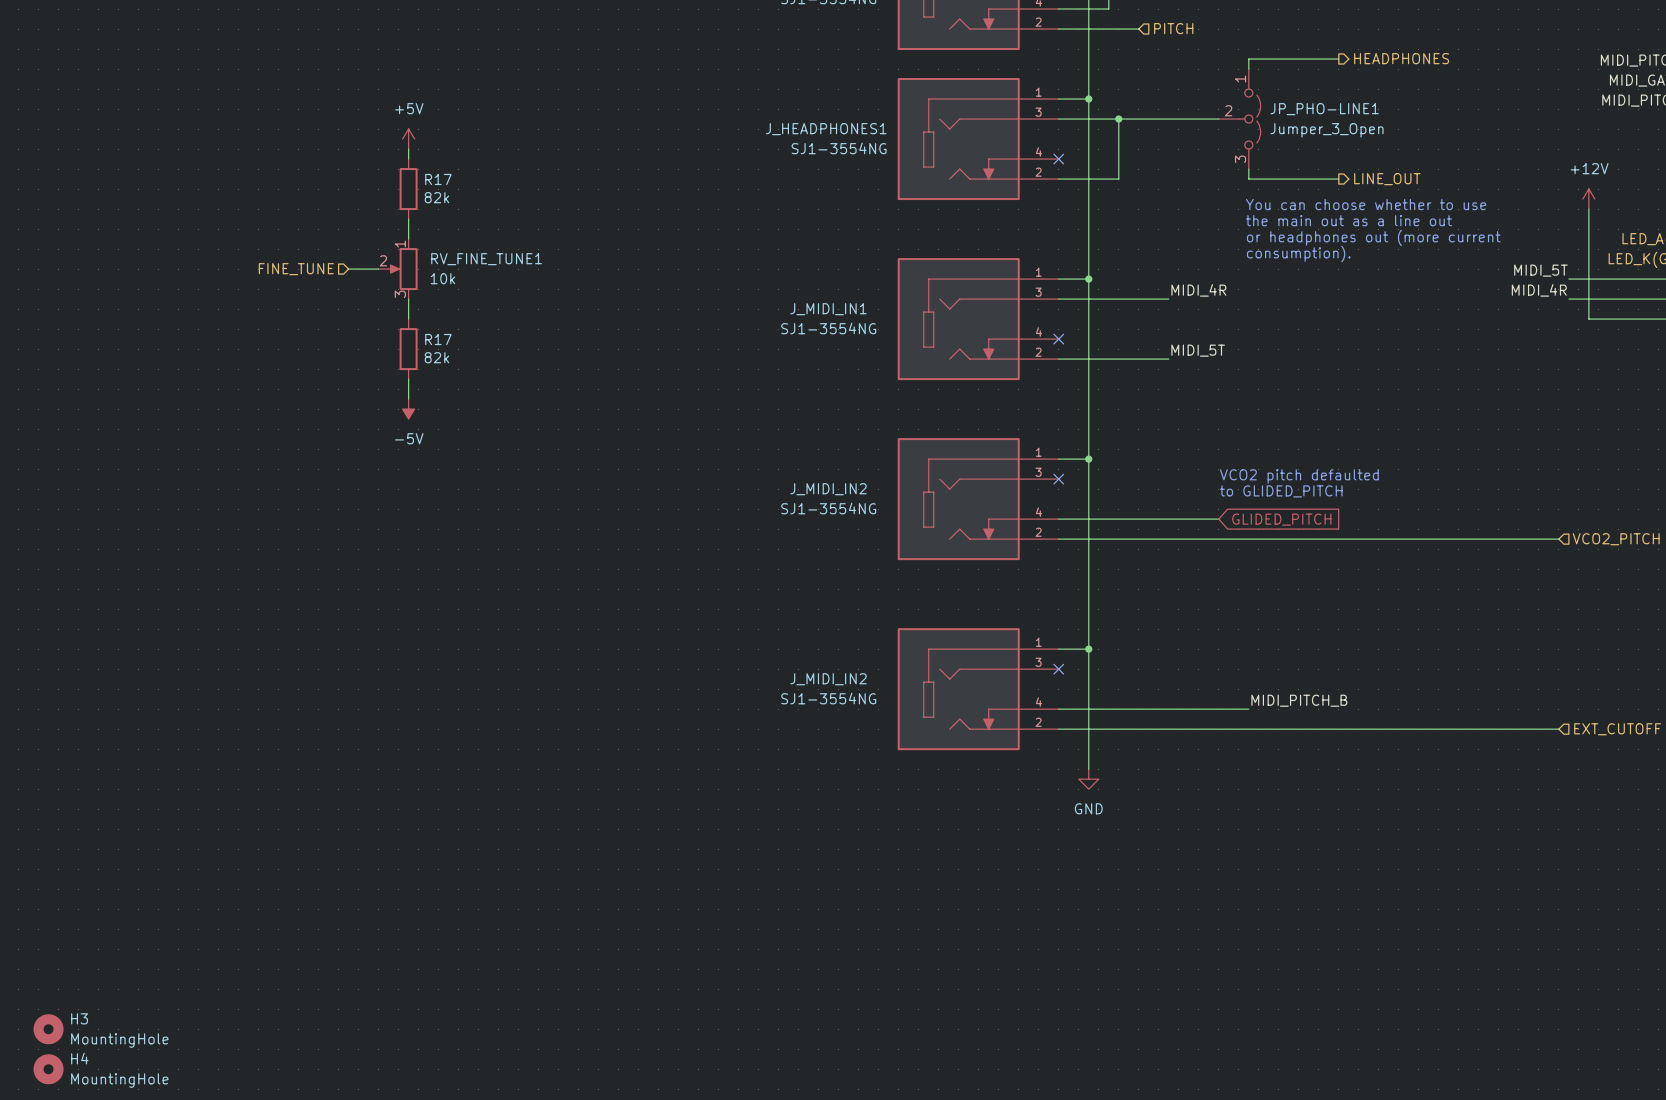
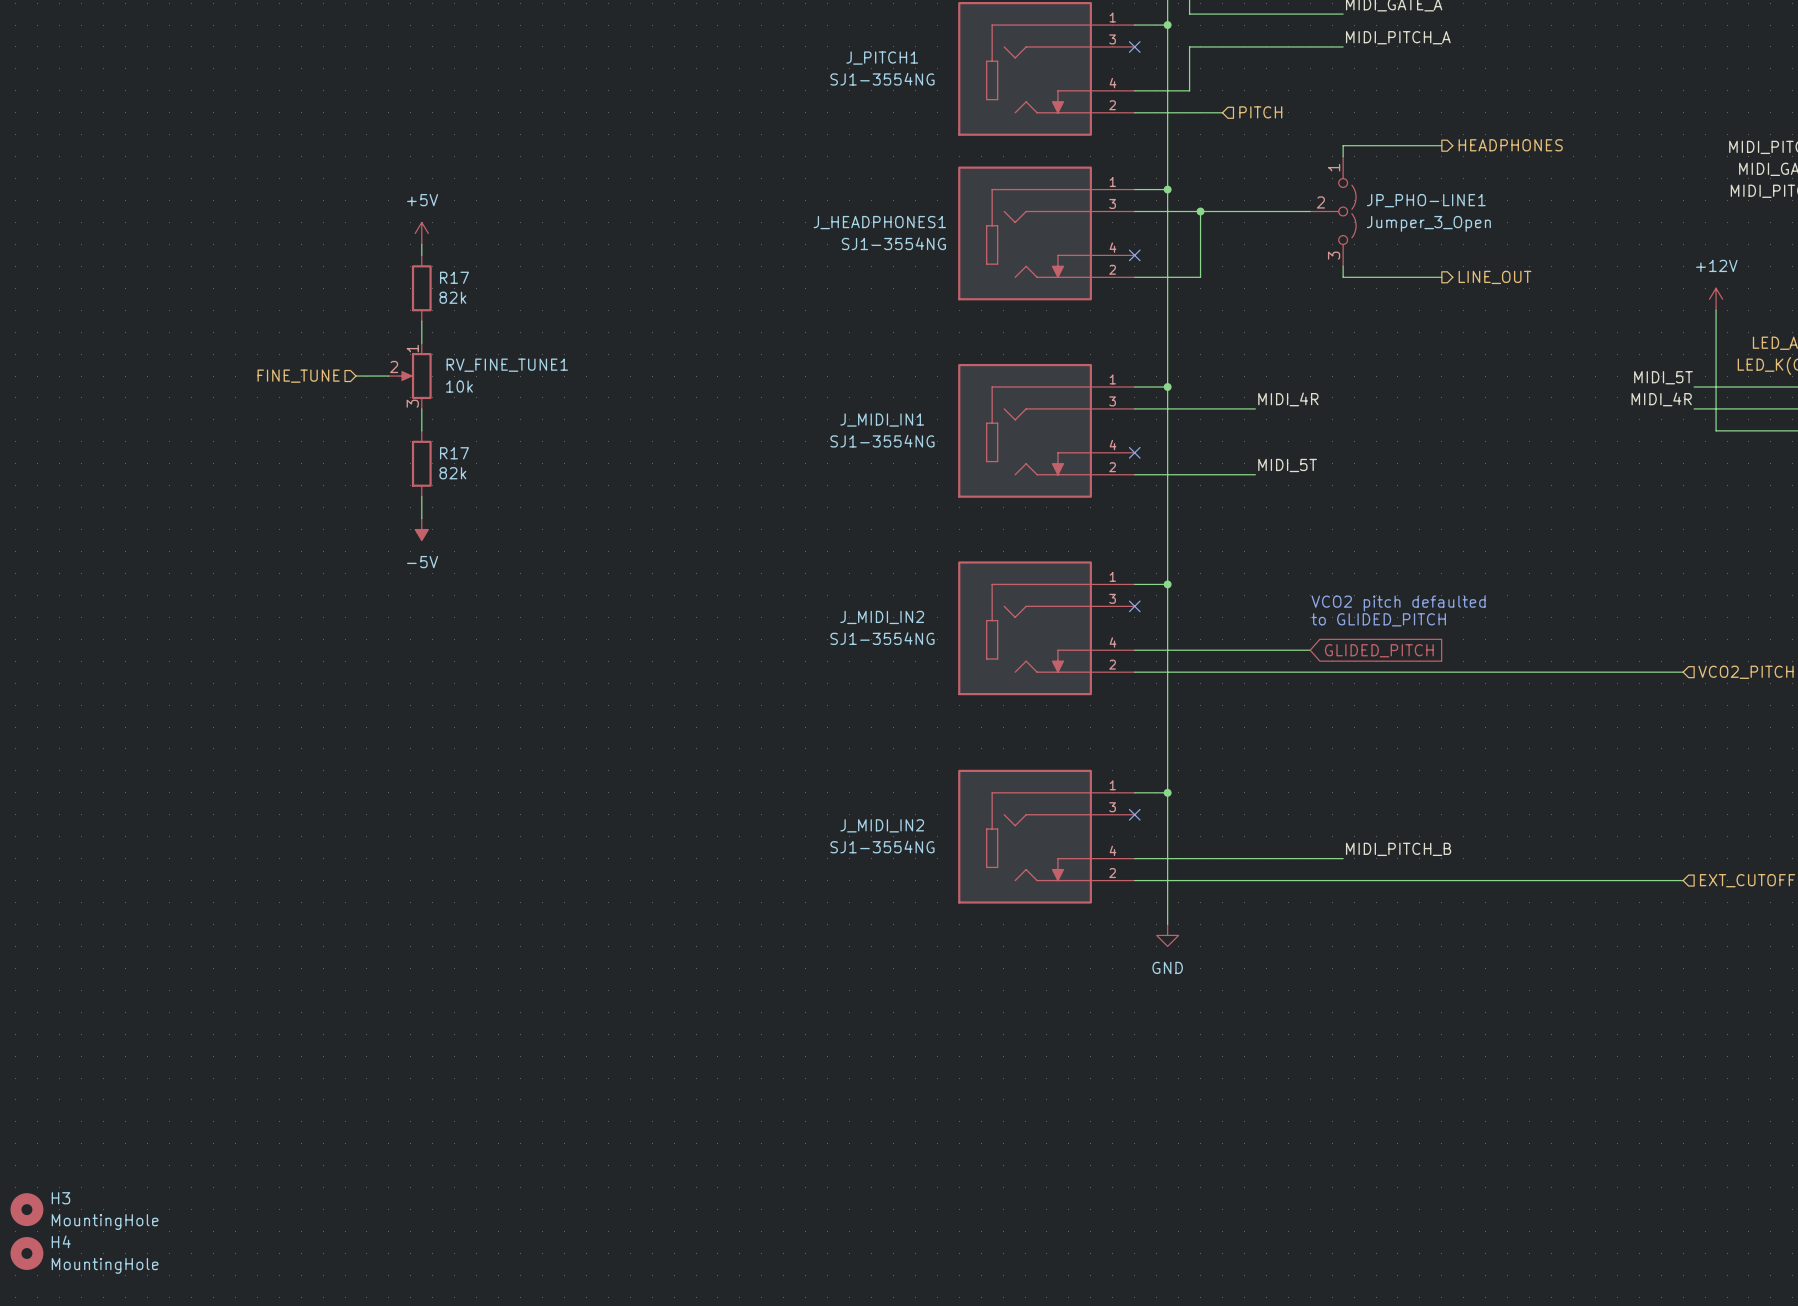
text: You can choose whether to use (1366, 204) -> none
text: the main out as a line out (1348, 220) -> none
text: or headphones out (more current (1373, 237) -> none
text: consumption). (1298, 254) -> none

